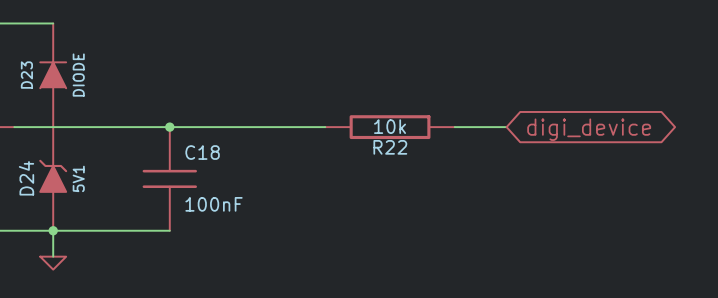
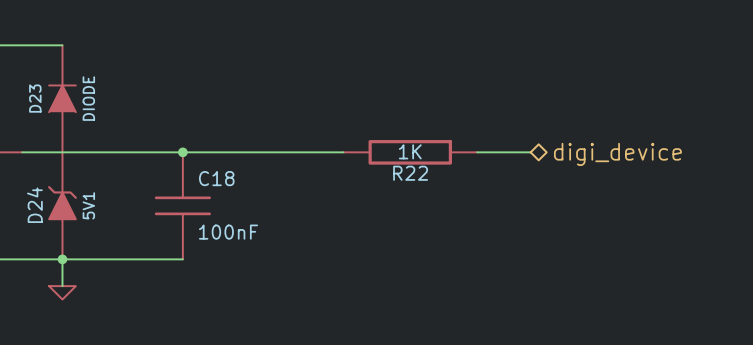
R22 value: 10k (390, 126) -> 1K (410, 151)
global label: digi_device (589, 129) -> none
hierarchical label: none -> digi_device (617, 154)

